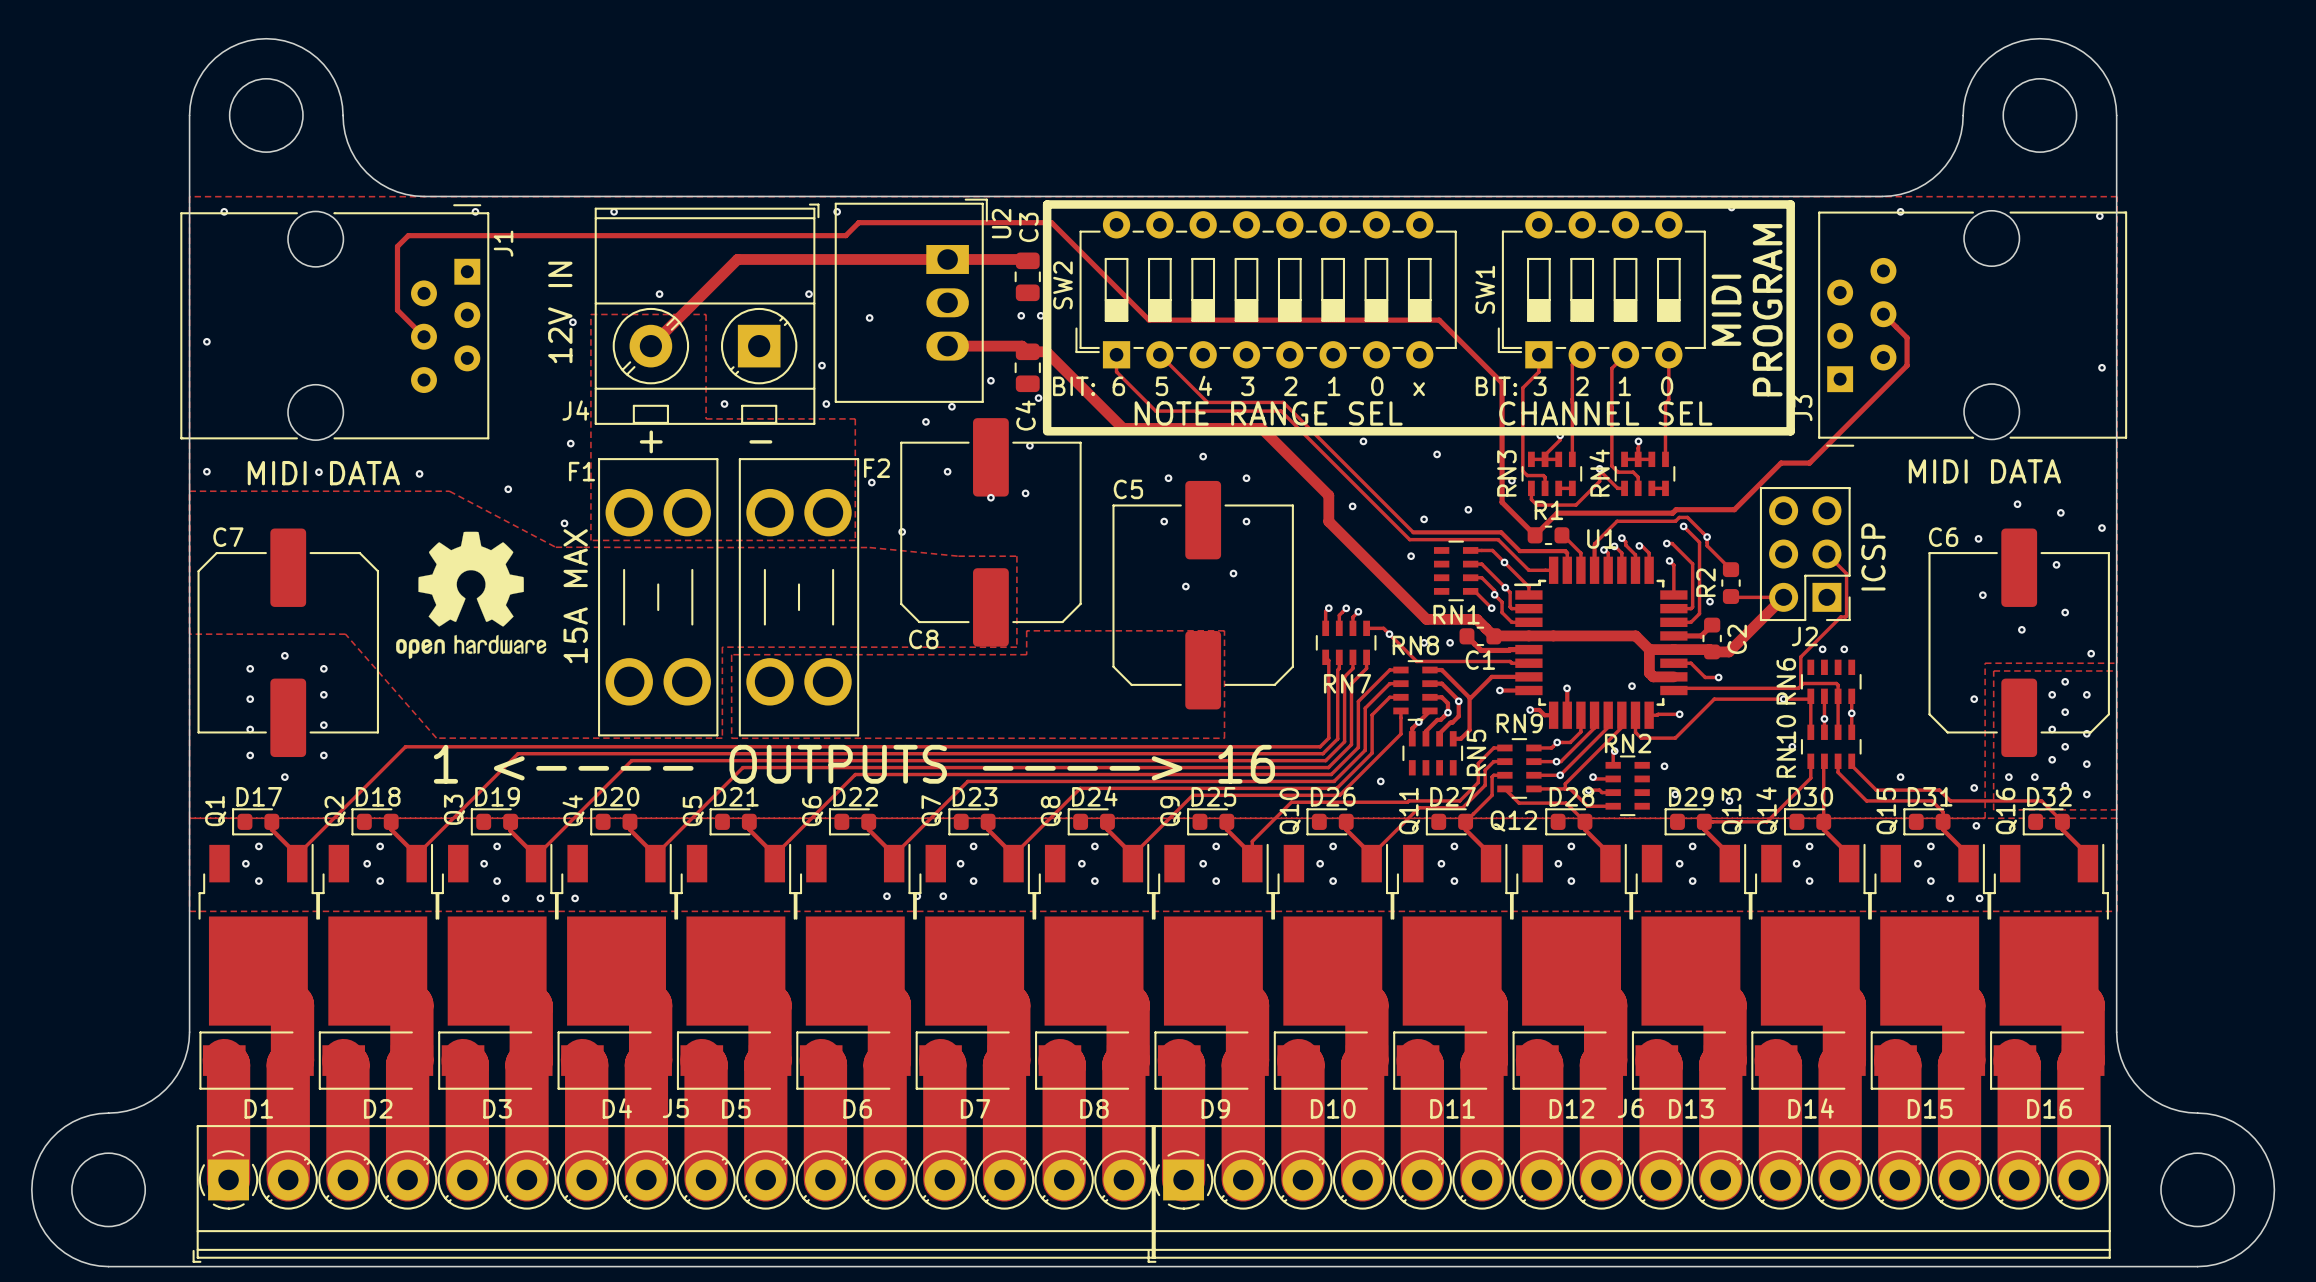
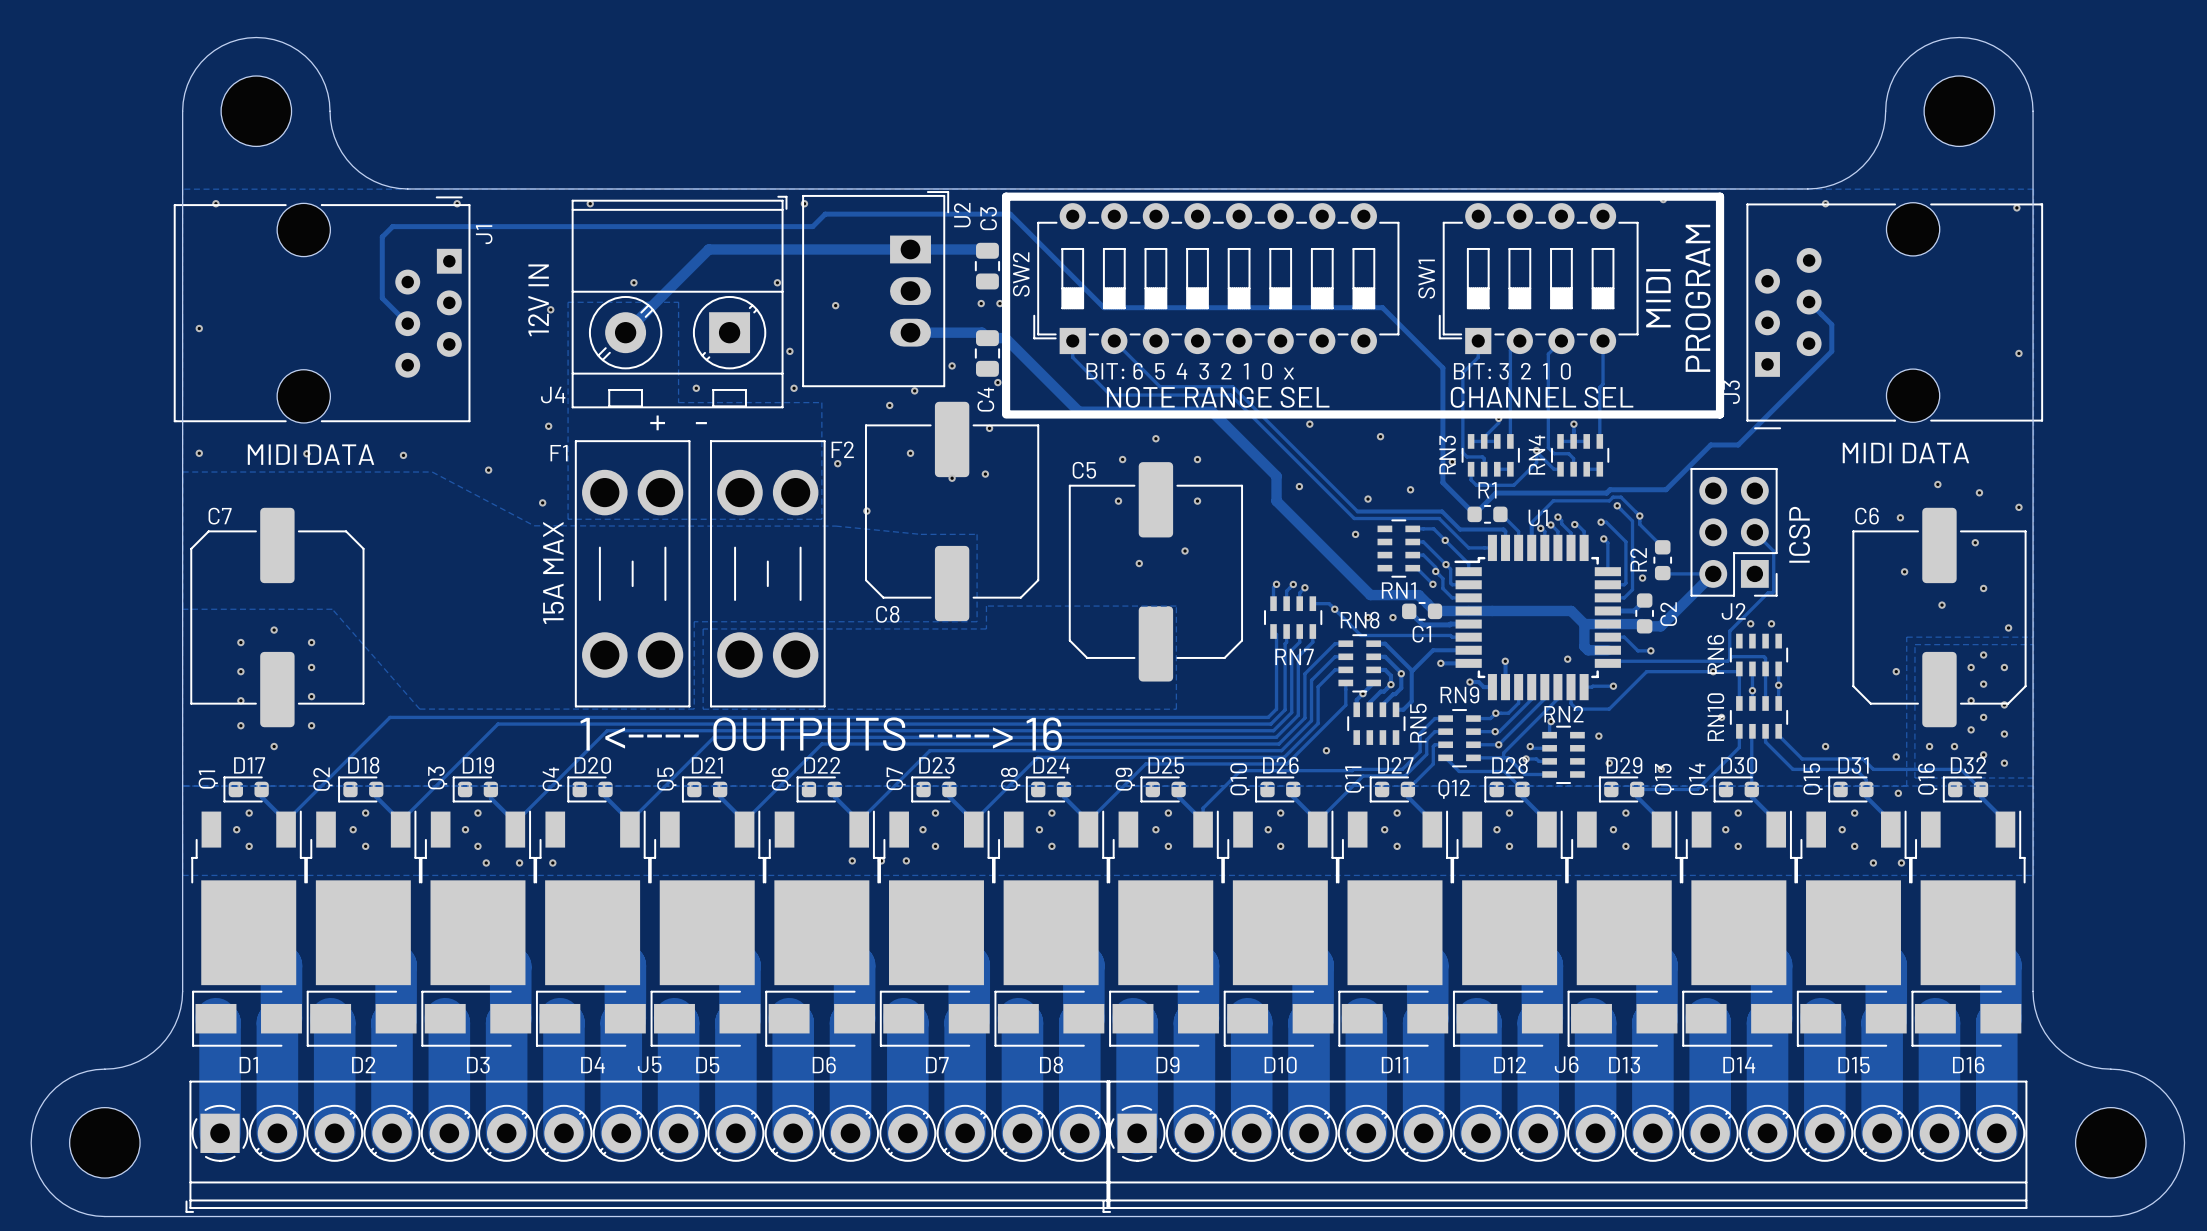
drawing: [396, 531, 547, 659] -> none

